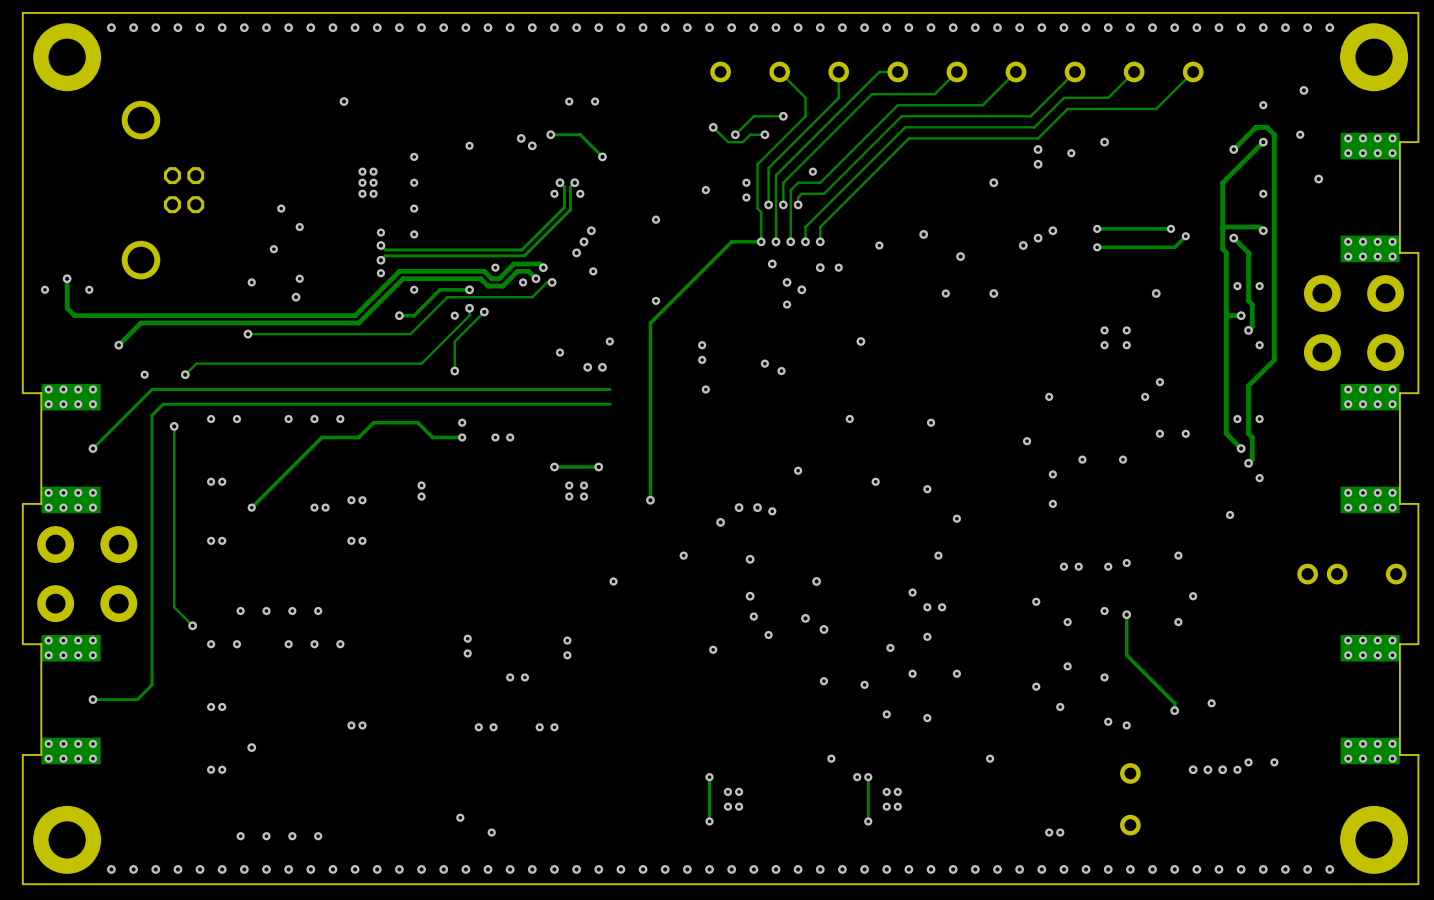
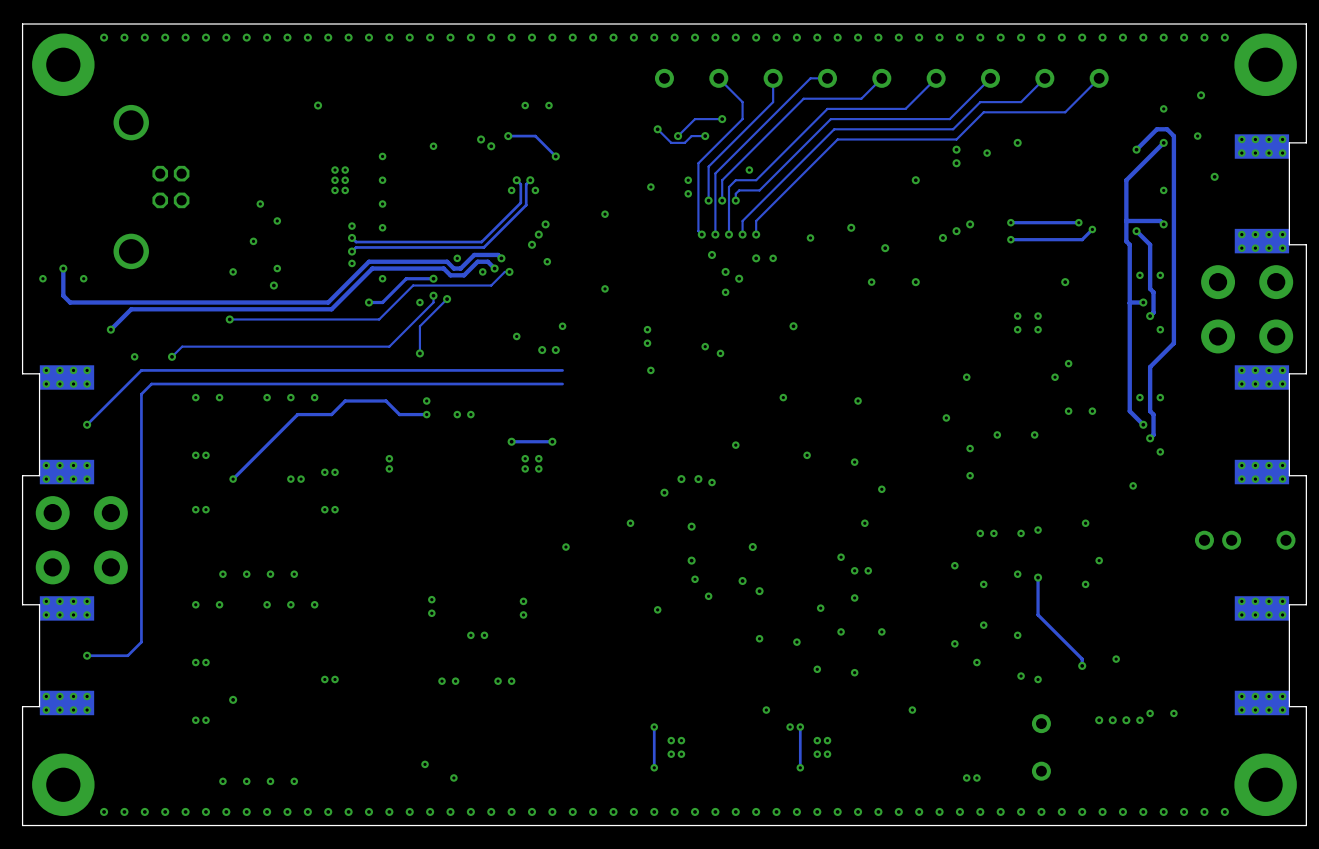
track: (757, 208) (761, 212) (761, 241) (731, 241) (650, 323) (650, 500) -> (698, 204) (698, 231) (701, 234)
track: (174, 426) (174, 607) (192, 625) -> none
via: (174, 426) -> none
via: (650, 500) -> none
via: (192, 625) -> none

